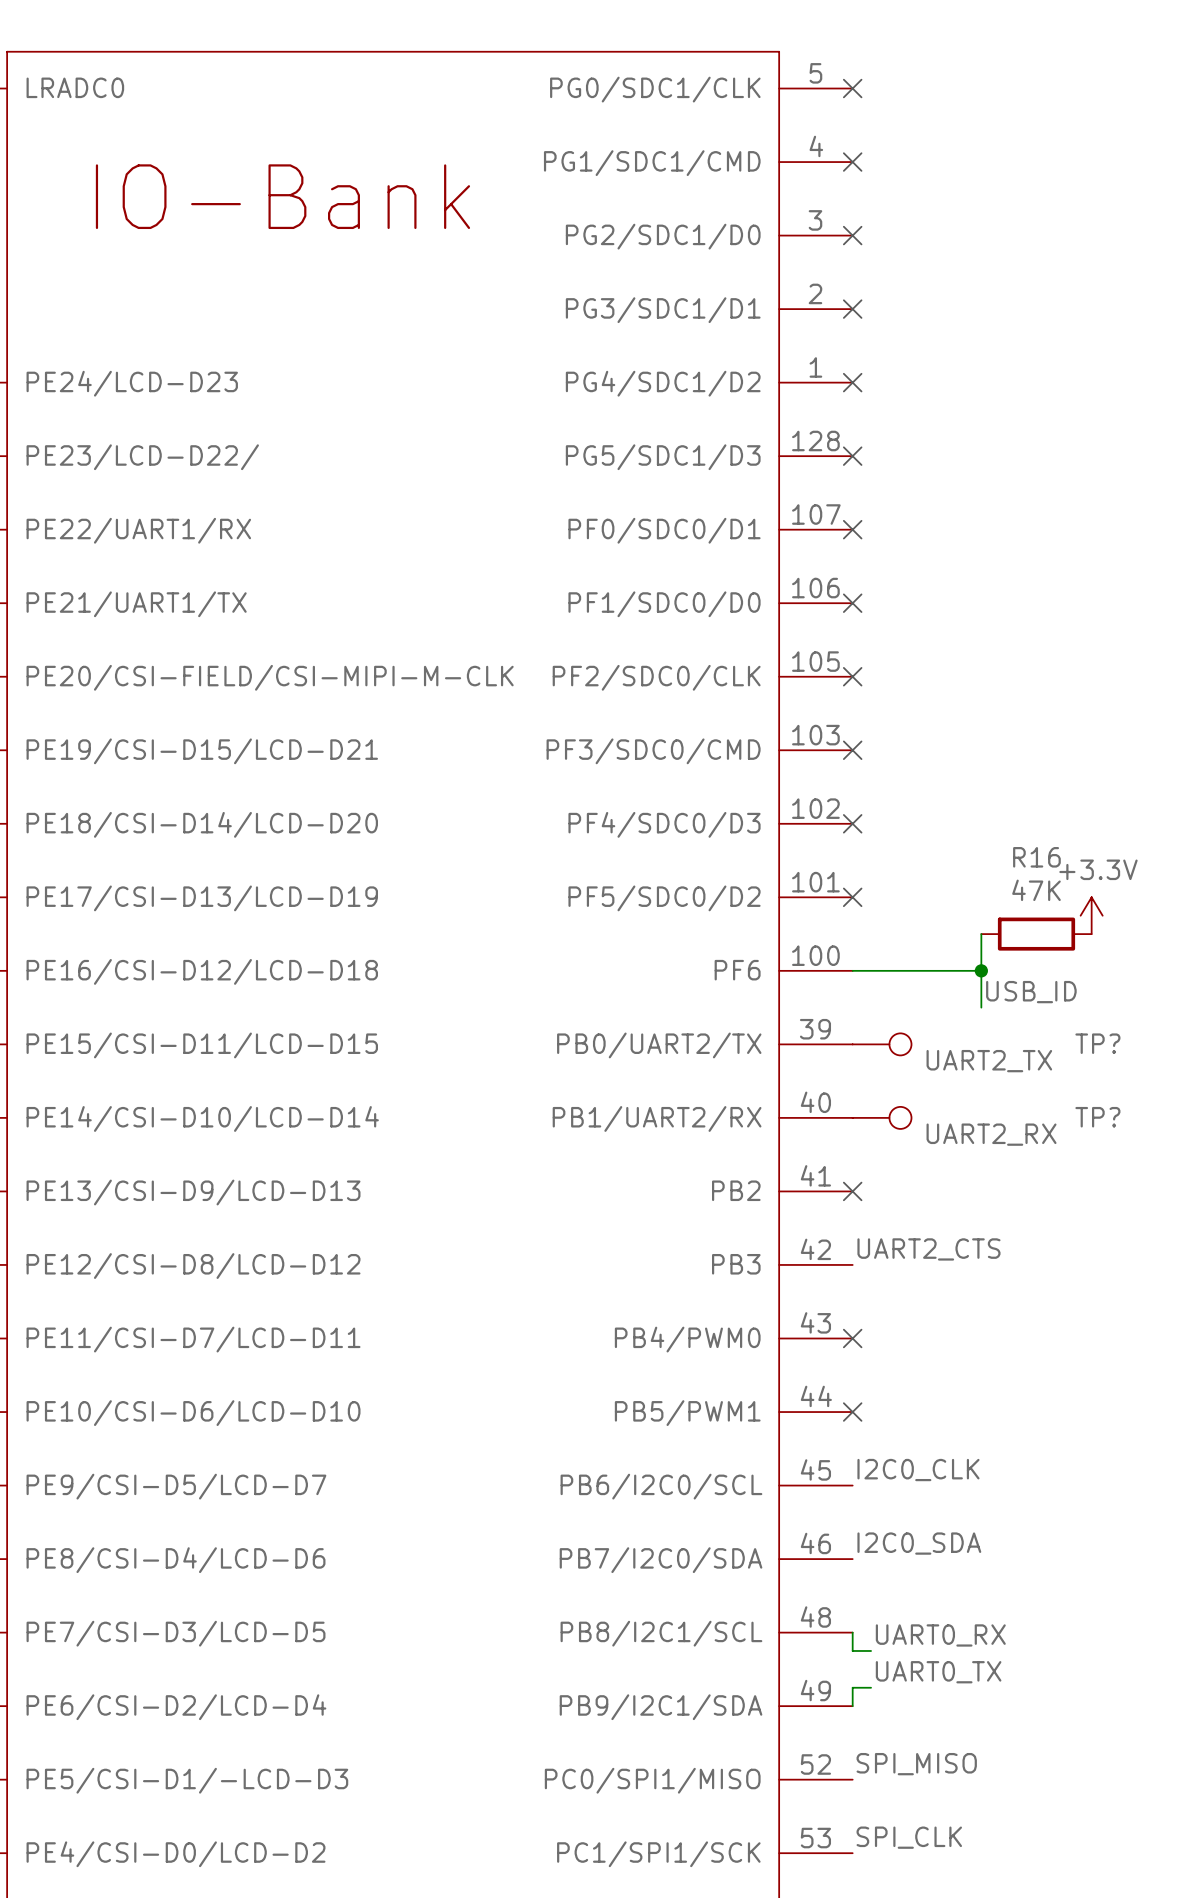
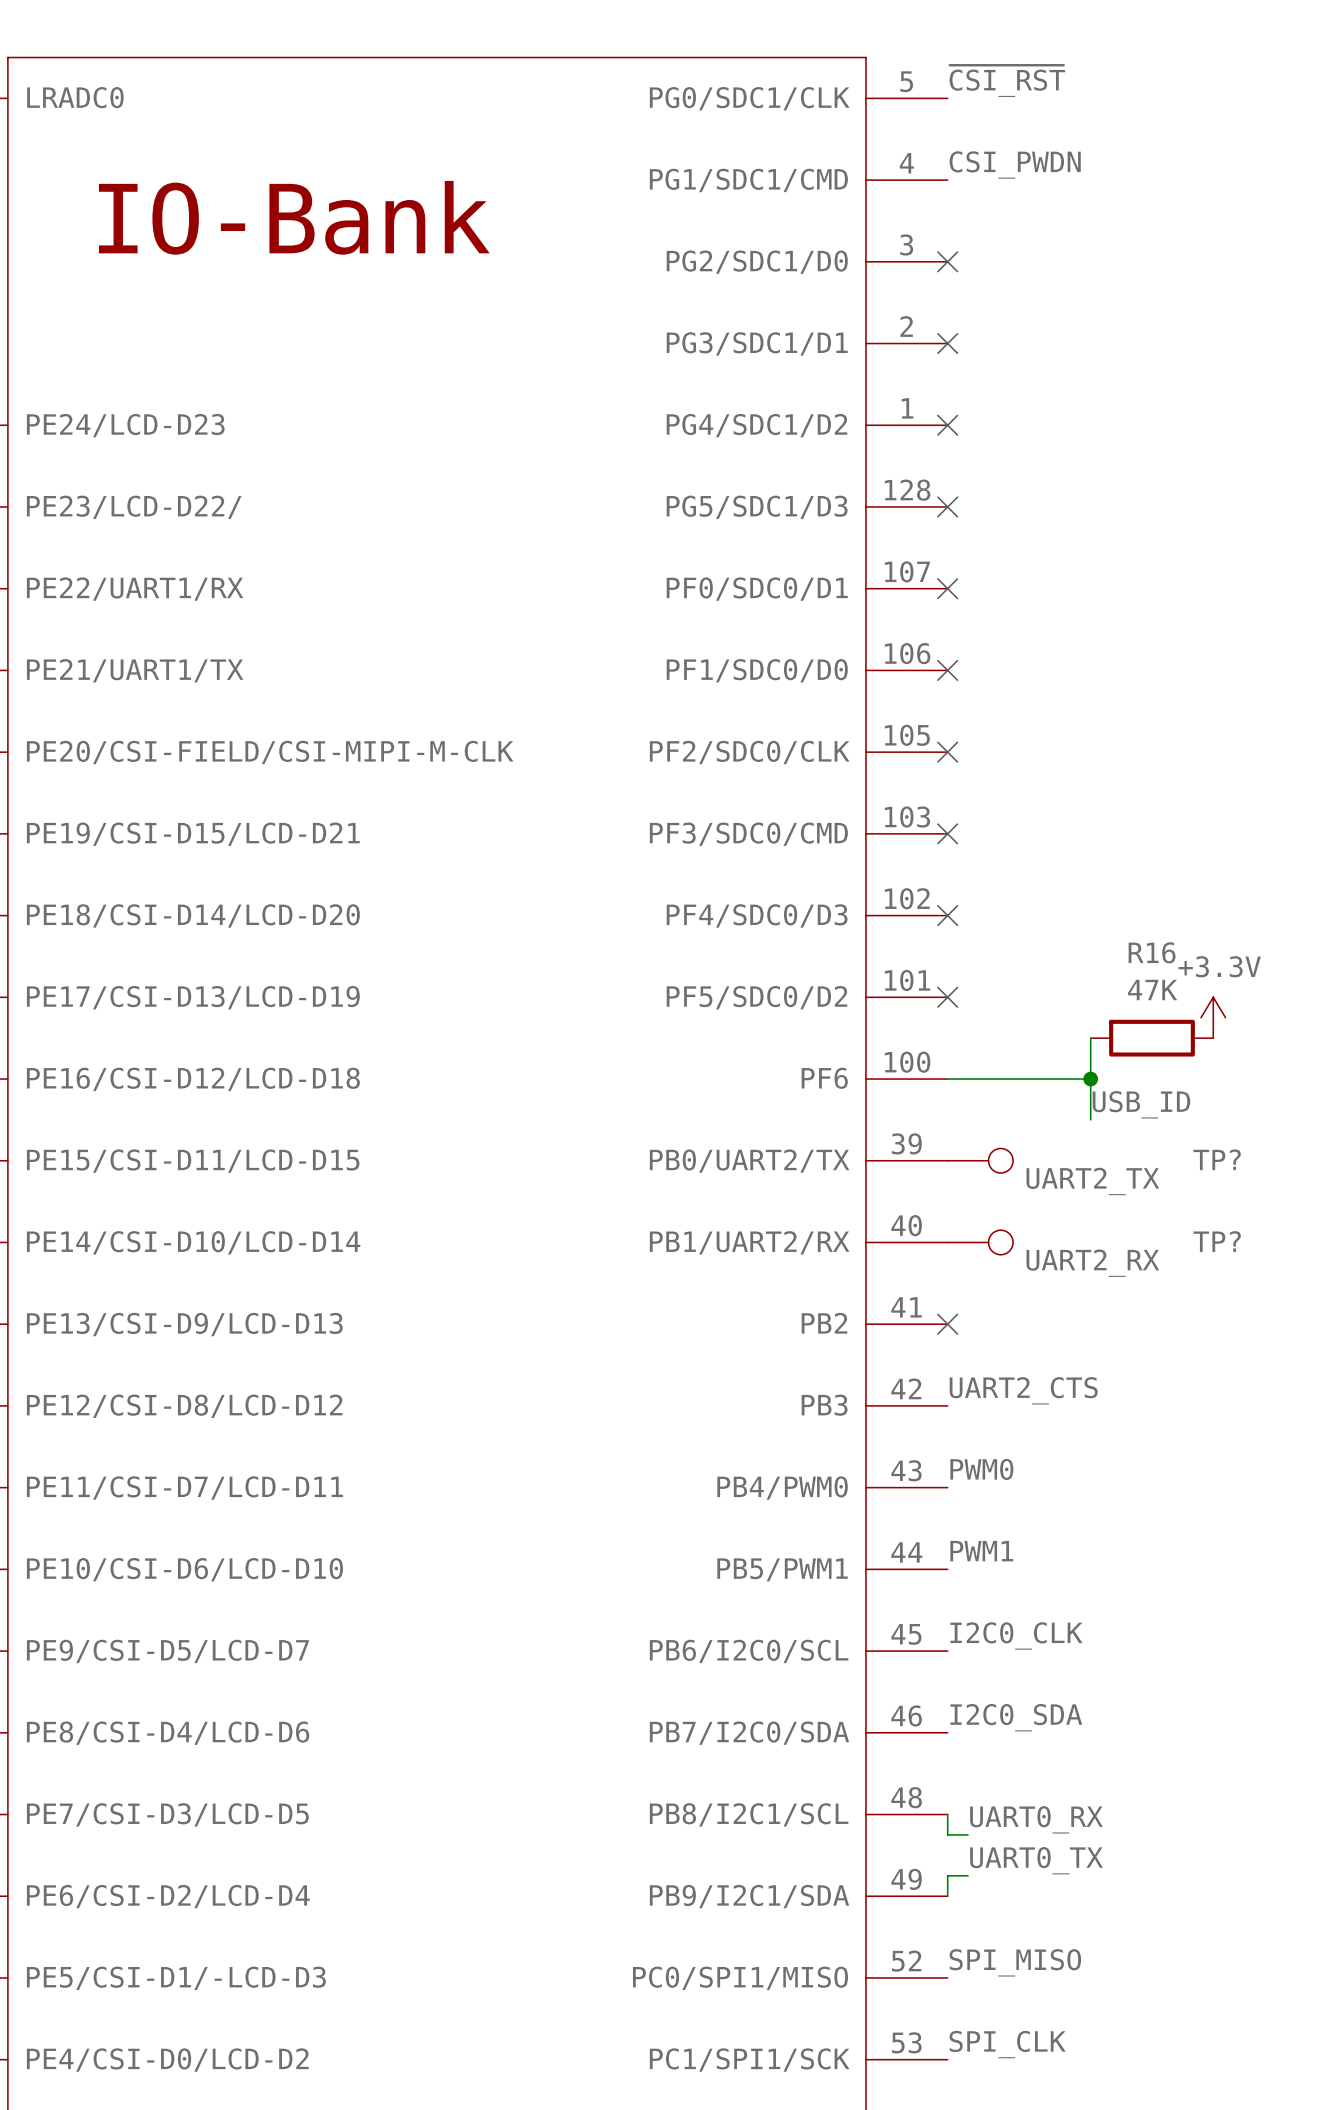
label: none -> ~{CSI_RST} (1007, 81)
no-connect mark: (852, 88) -> none
label: none -> CSI_PWDN (1015, 164)
no-connect mark: (852, 162) -> none
label: none -> PWM0 (981, 1469)
no-connect mark: (852, 1338) -> none
label: none -> PWM1 (981, 1551)
no-connect mark: (852, 1412) -> none

